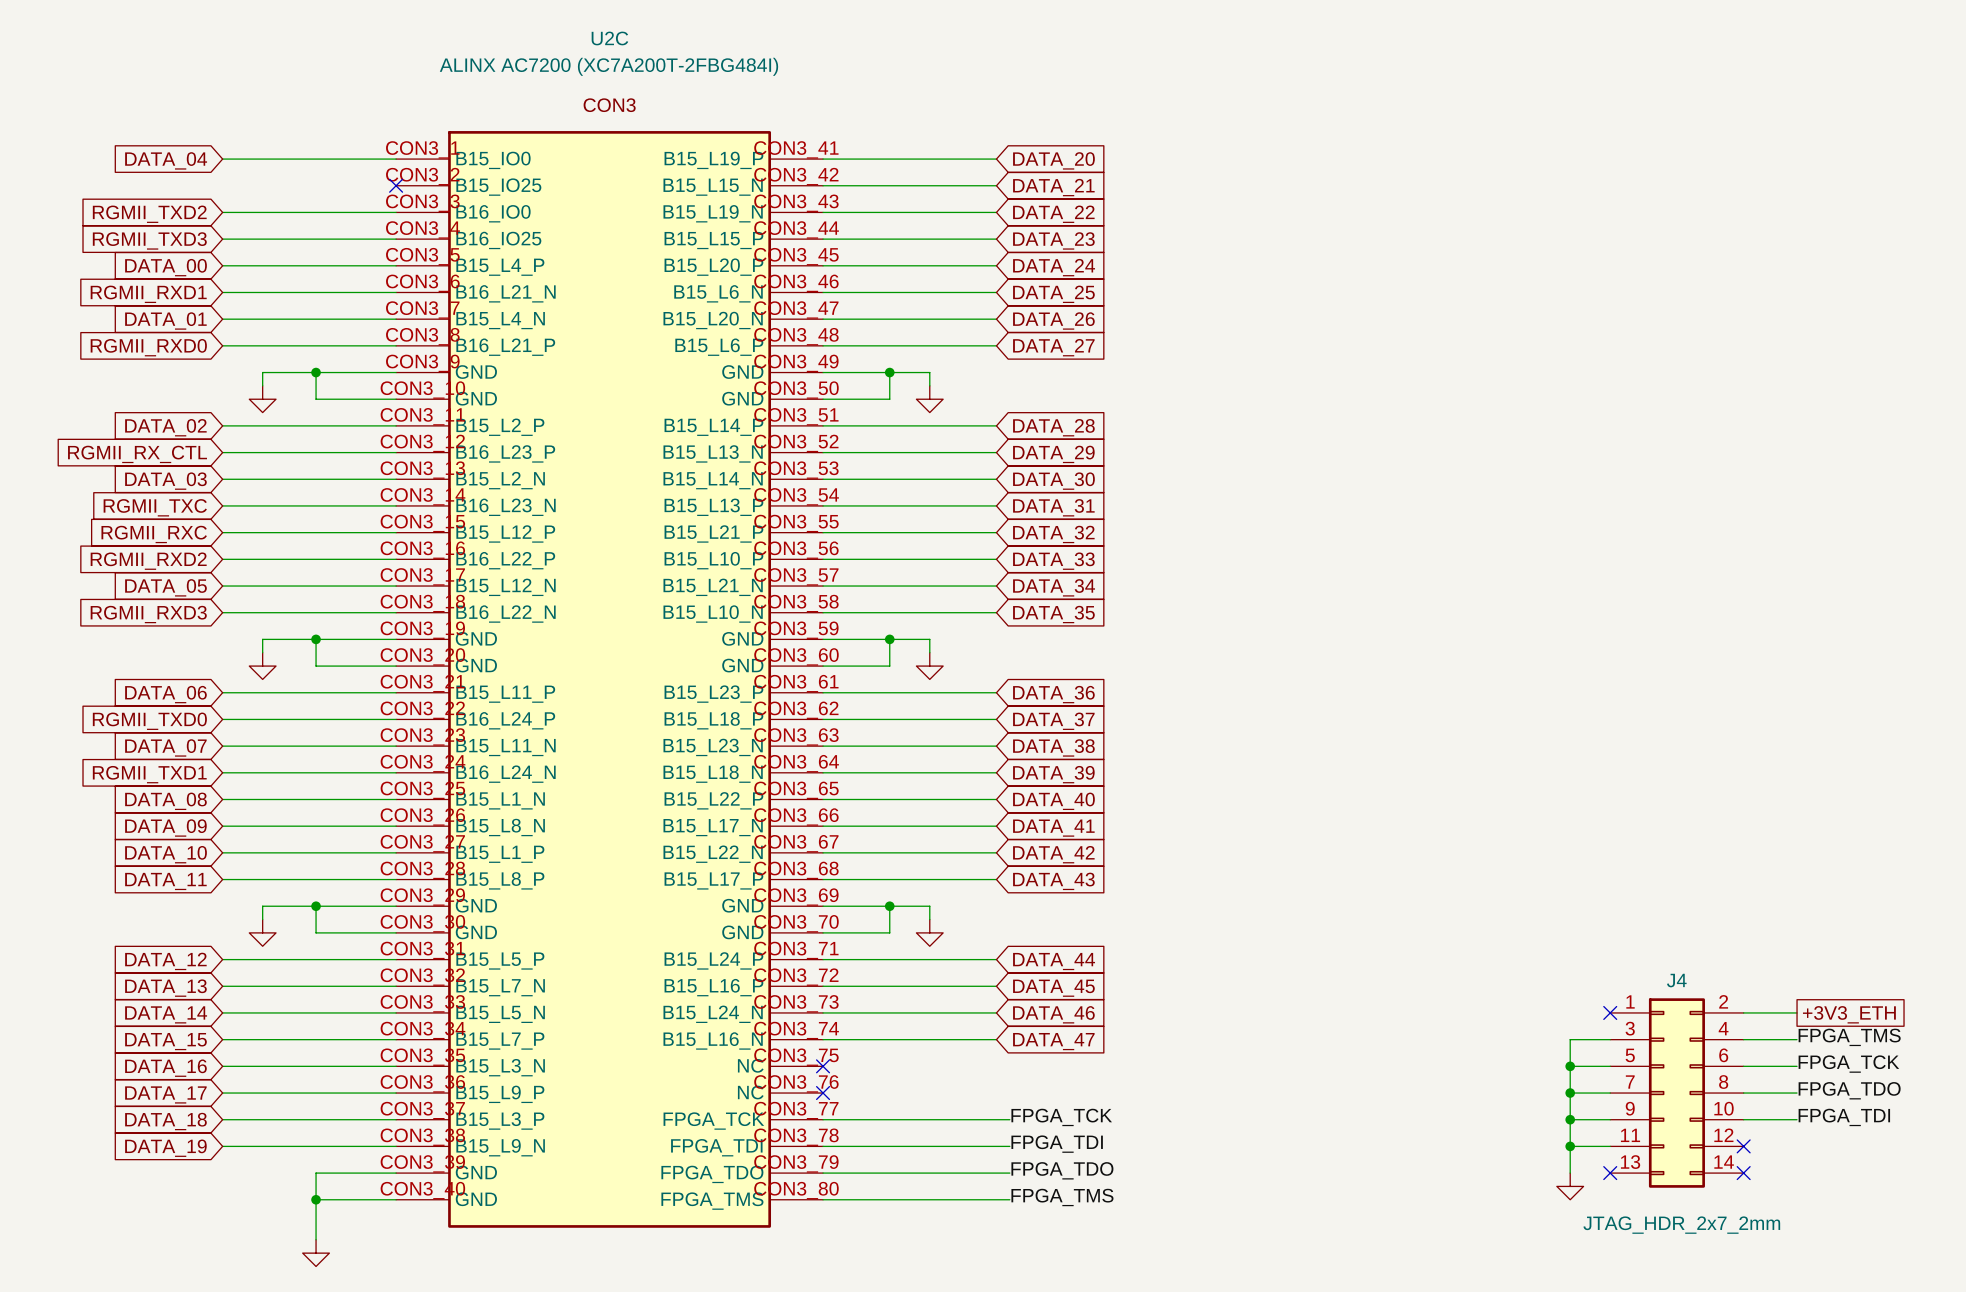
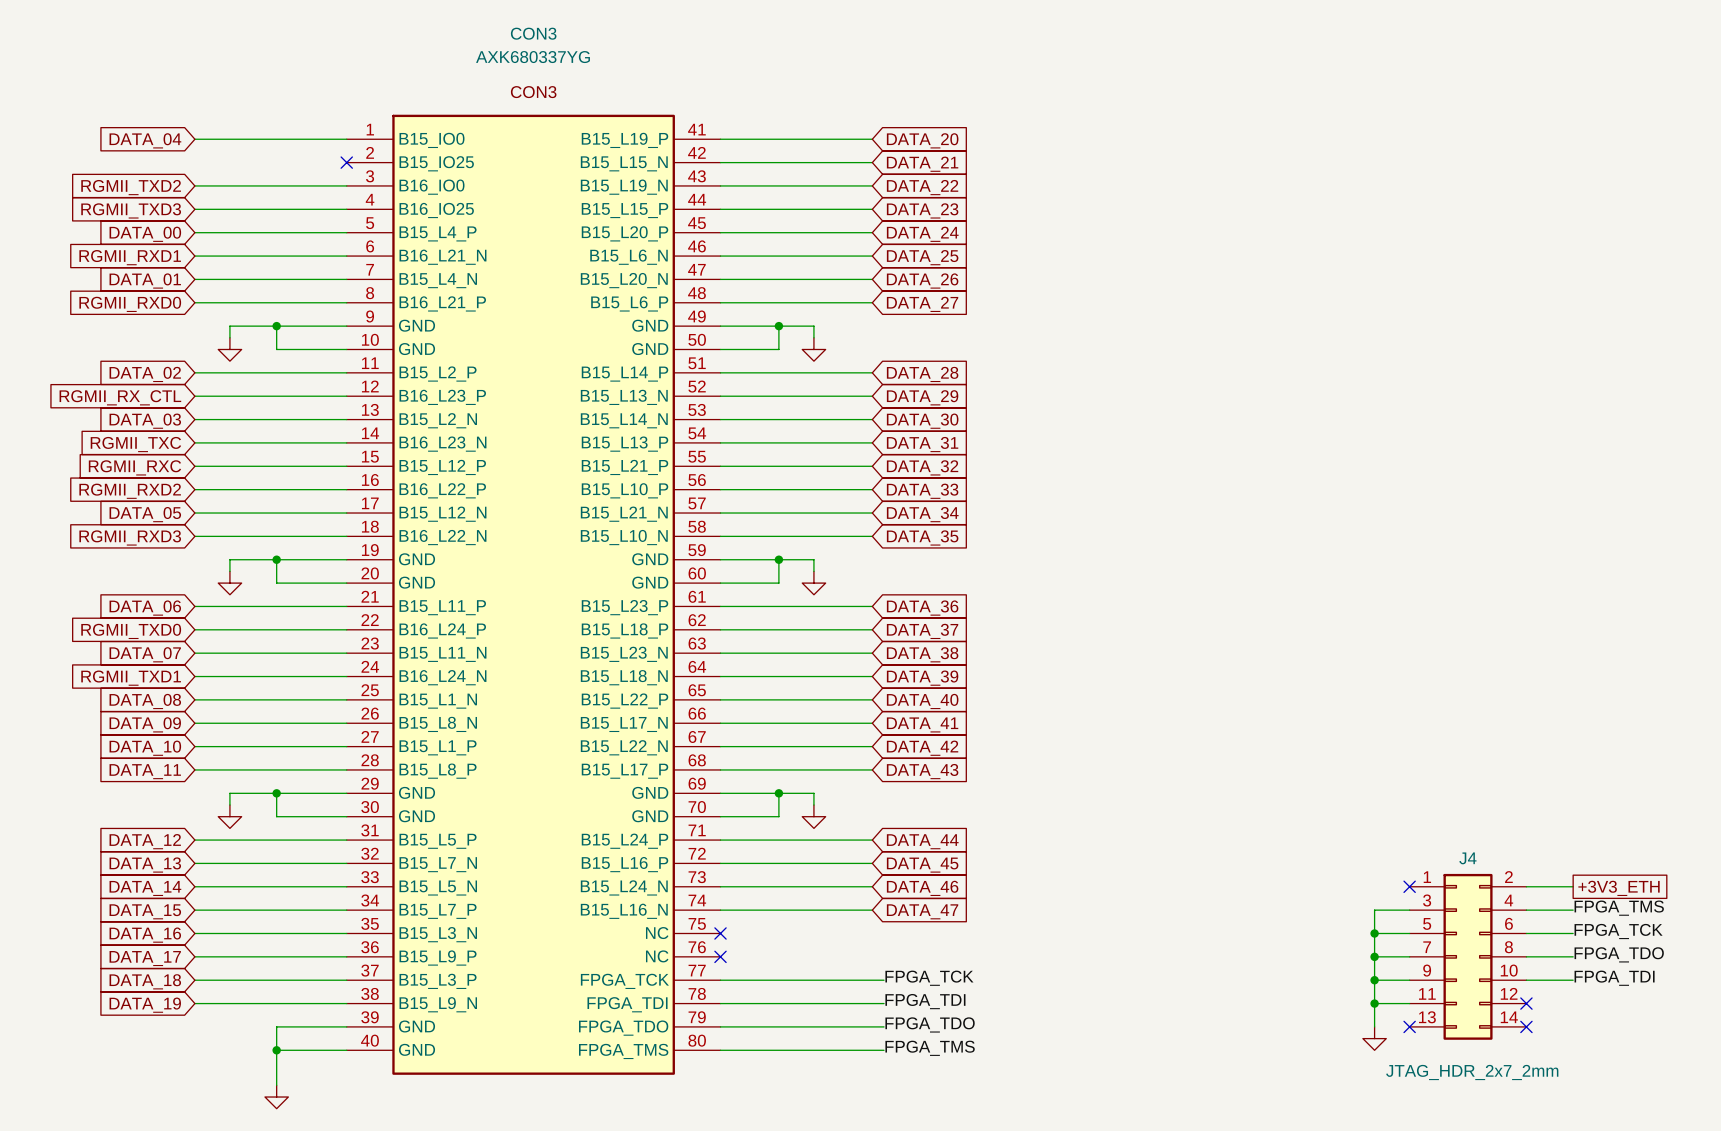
U2C name: U2C (609, 38) -> CON3 (533, 33)
U2C value: ALINX AC7200 (XC7A200T-2FBG484I) (608, 66) -> AXK680337YG (533, 57)
U2C symbol: [396, 131, 824, 1228] -> [346, 114, 721, 1075]

